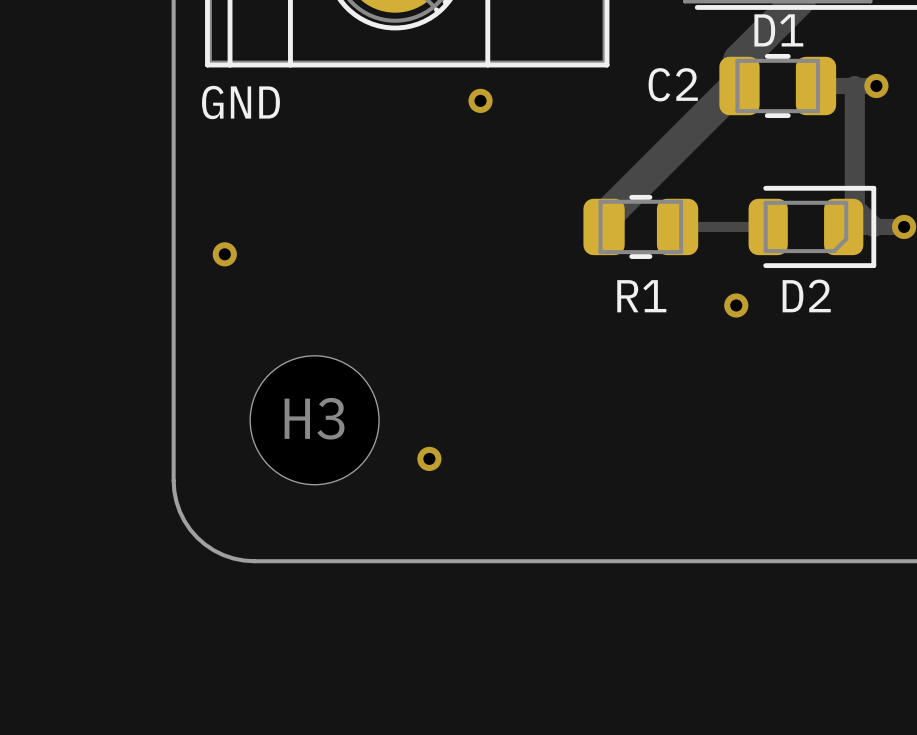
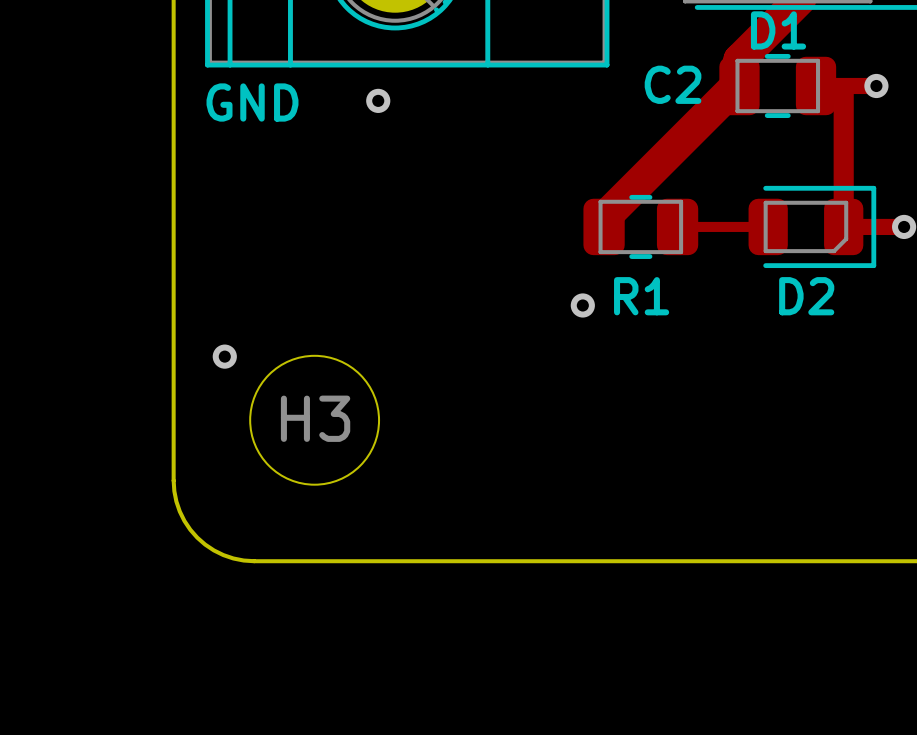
track: (854, 85) (854, 207) (873, 226) -> none
track: none -> (843, 88) (843, 226)
via position: (480, 100) -> (378, 100)
via position: (224, 254) -> (224, 356)
via: none -> (582, 305)
via: (736, 305) -> none
via: (429, 458) -> none

